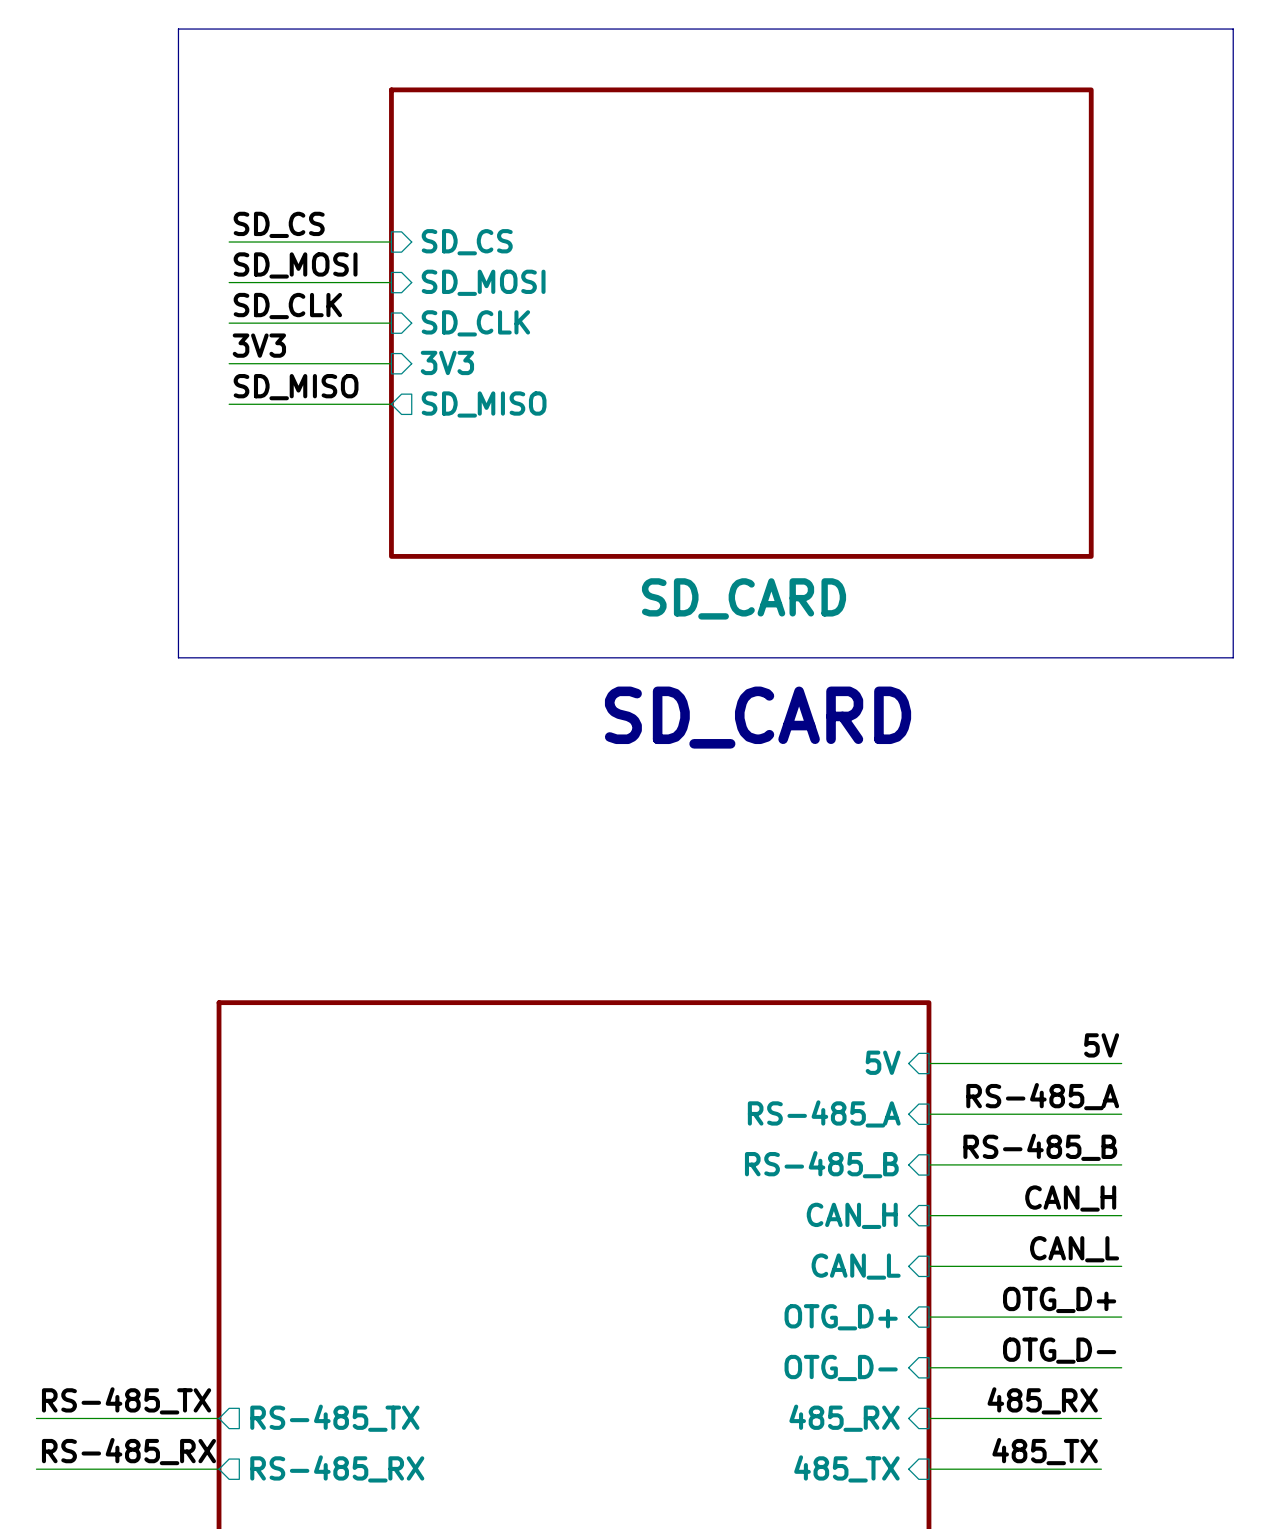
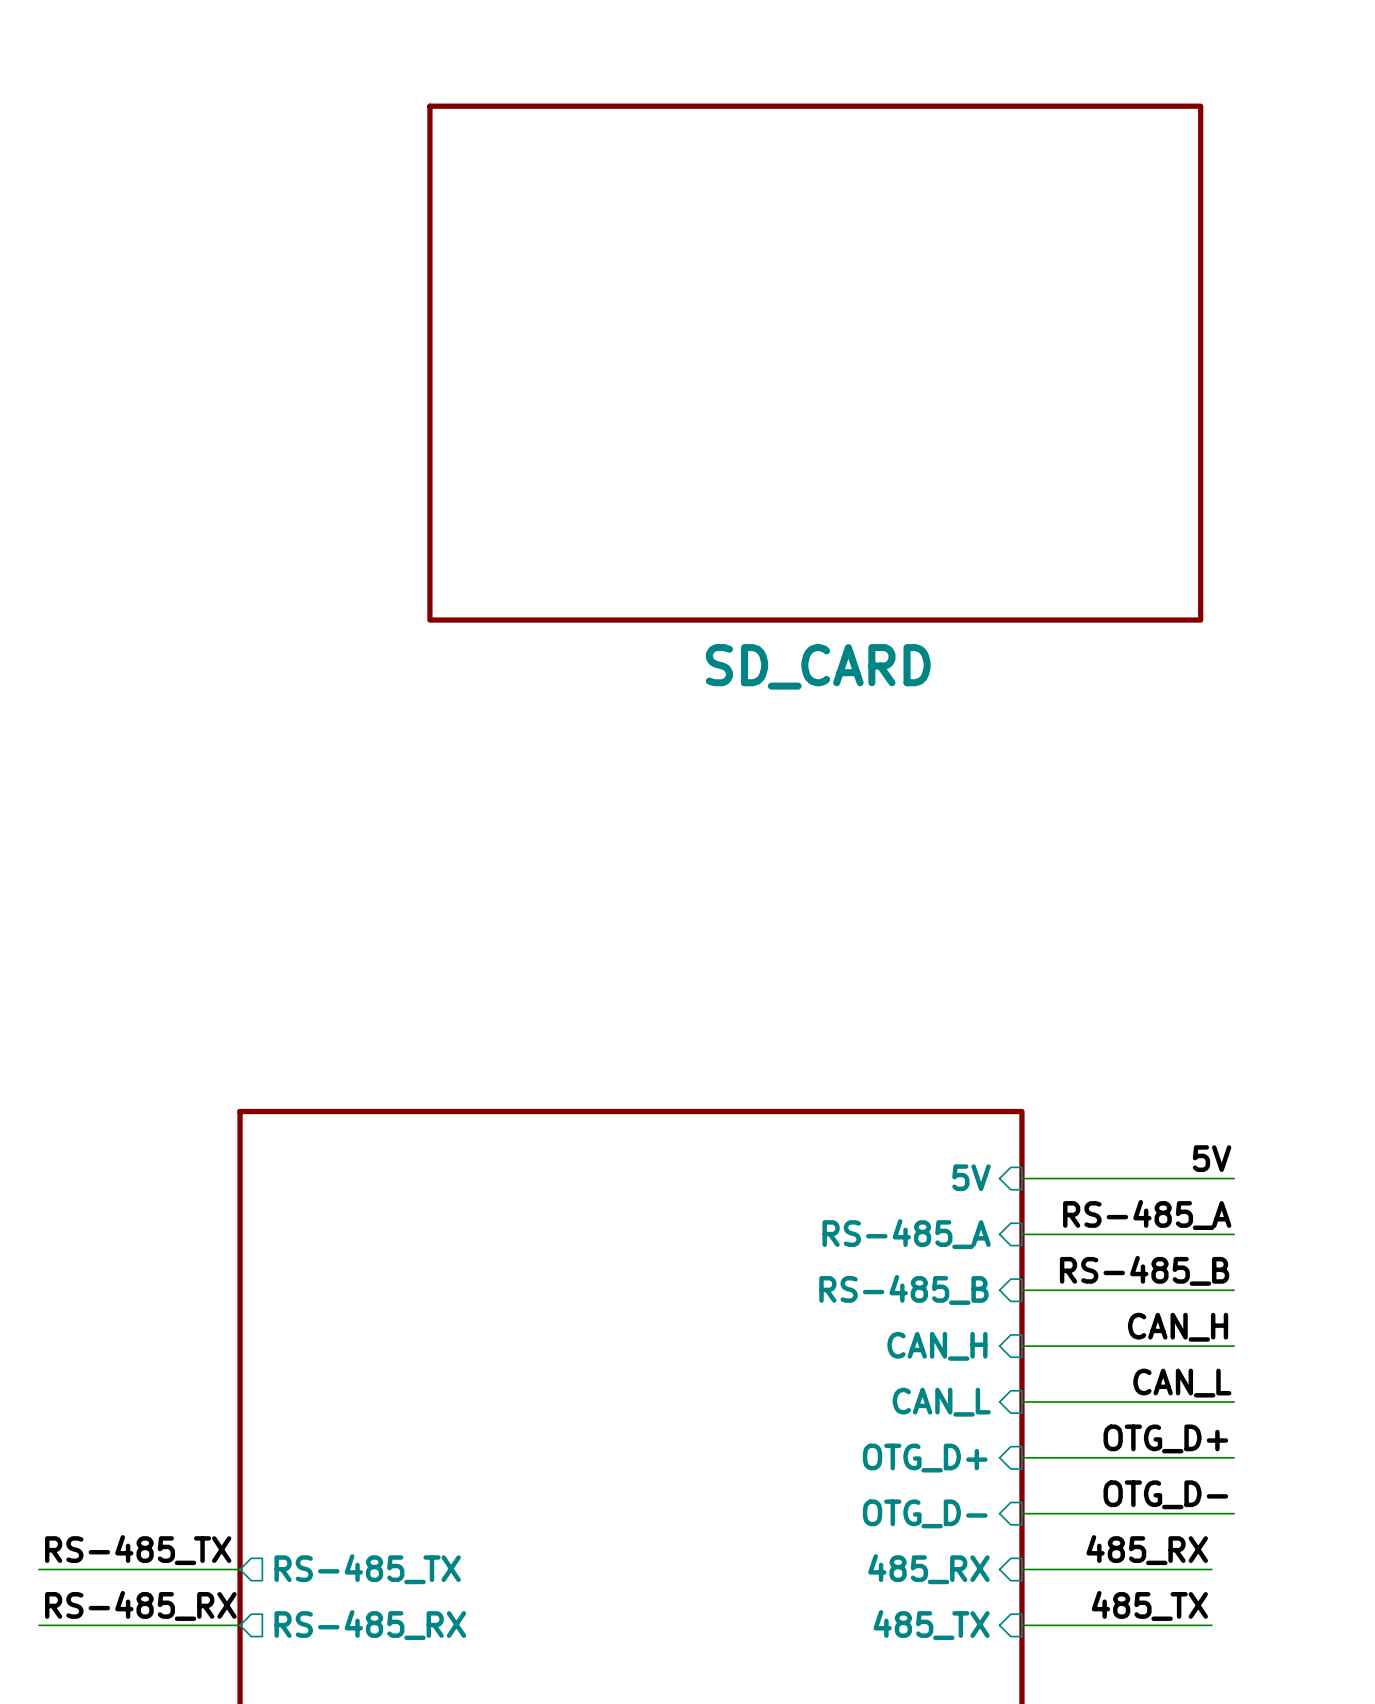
bus: (178, 29) (1233, 29) (1233, 657) (178, 657) (178, 29) -> none
label: SD_CS (279, 224) -> none
wire: (229, 242) (391, 242) -> none
sheet pin: SD_CS (467, 242) -> none
label: SD_MOSI (295, 265) -> none
wire: (229, 282) (391, 282) -> none
sheet pin: SD_MOSI (483, 282) -> none
label: SD_CLK (287, 306) -> none
wire: (229, 323) (391, 323) -> none
sheet pin: SD_CLK (475, 323) -> none
label: 3V3 (259, 345) -> none
sheet pin: 3V3 (447, 362) -> none
wire: (229, 363) (391, 363) -> none
label: SD_MISO (296, 387) -> none
wire: (229, 404) (391, 404) -> none
sheet pin: SD_MISO (484, 404) -> none
text: SD_CARD (758, 717) -> none

